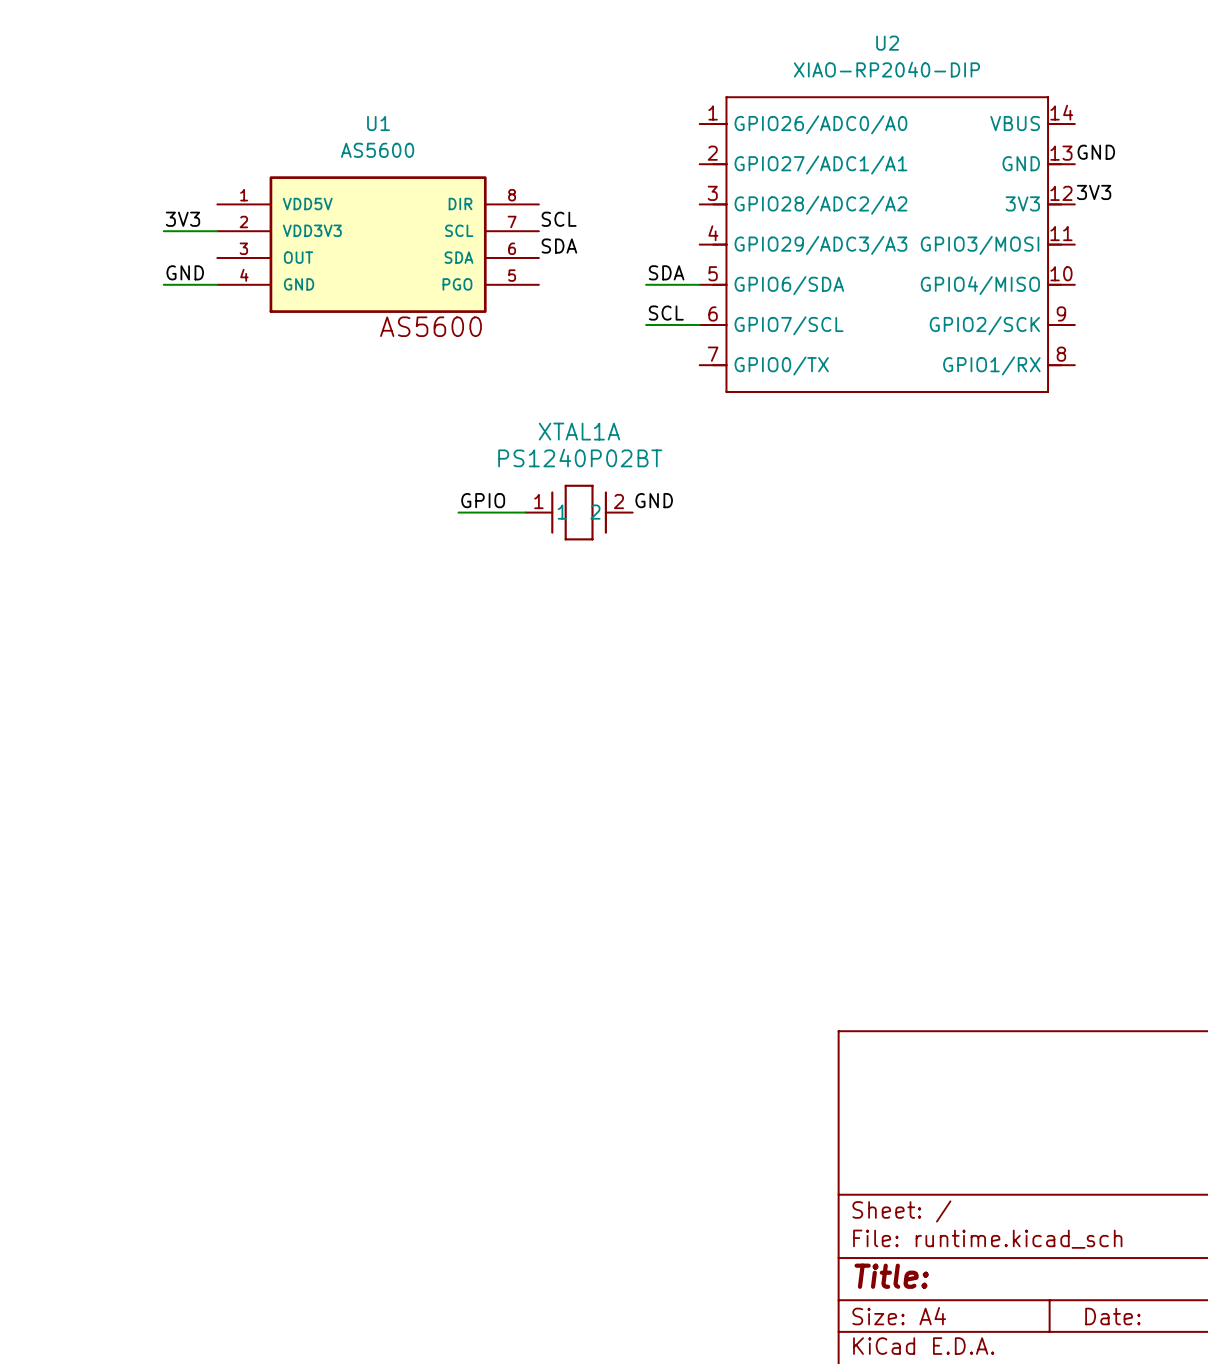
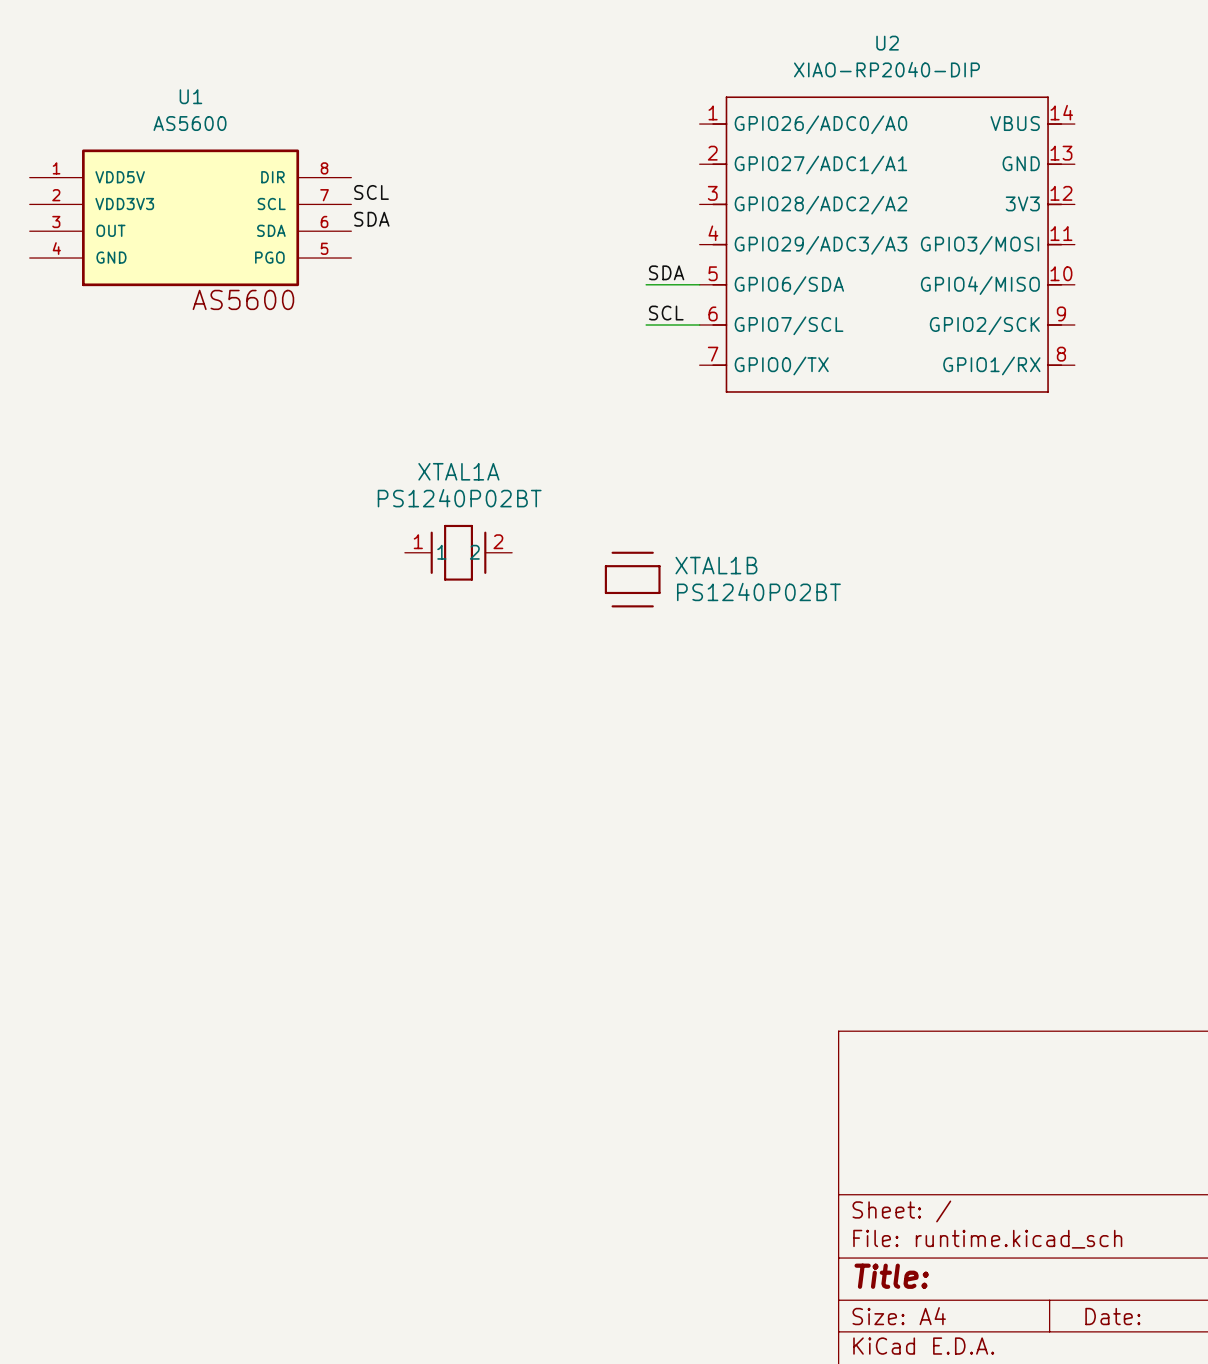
label: GND (1096, 152) -> none
label: 3V3 (1094, 192) -> none
label: 3V3 (182, 219) -> none
label position: SCL (559, 219) -> SCL (371, 192)
U1 position: (378, 244) -> (190, 217)
label position: SDA (559, 246) -> SDA (371, 219)
label: GND (185, 272) -> none
label: GPIO (483, 500) -> none
label: GND (654, 500) -> none
wire: (458, 512) (525, 512) -> none
XTAL1A position: (579, 512) -> (458, 552)
XTAL1B: none -> PS1240P02BT (632, 579)

